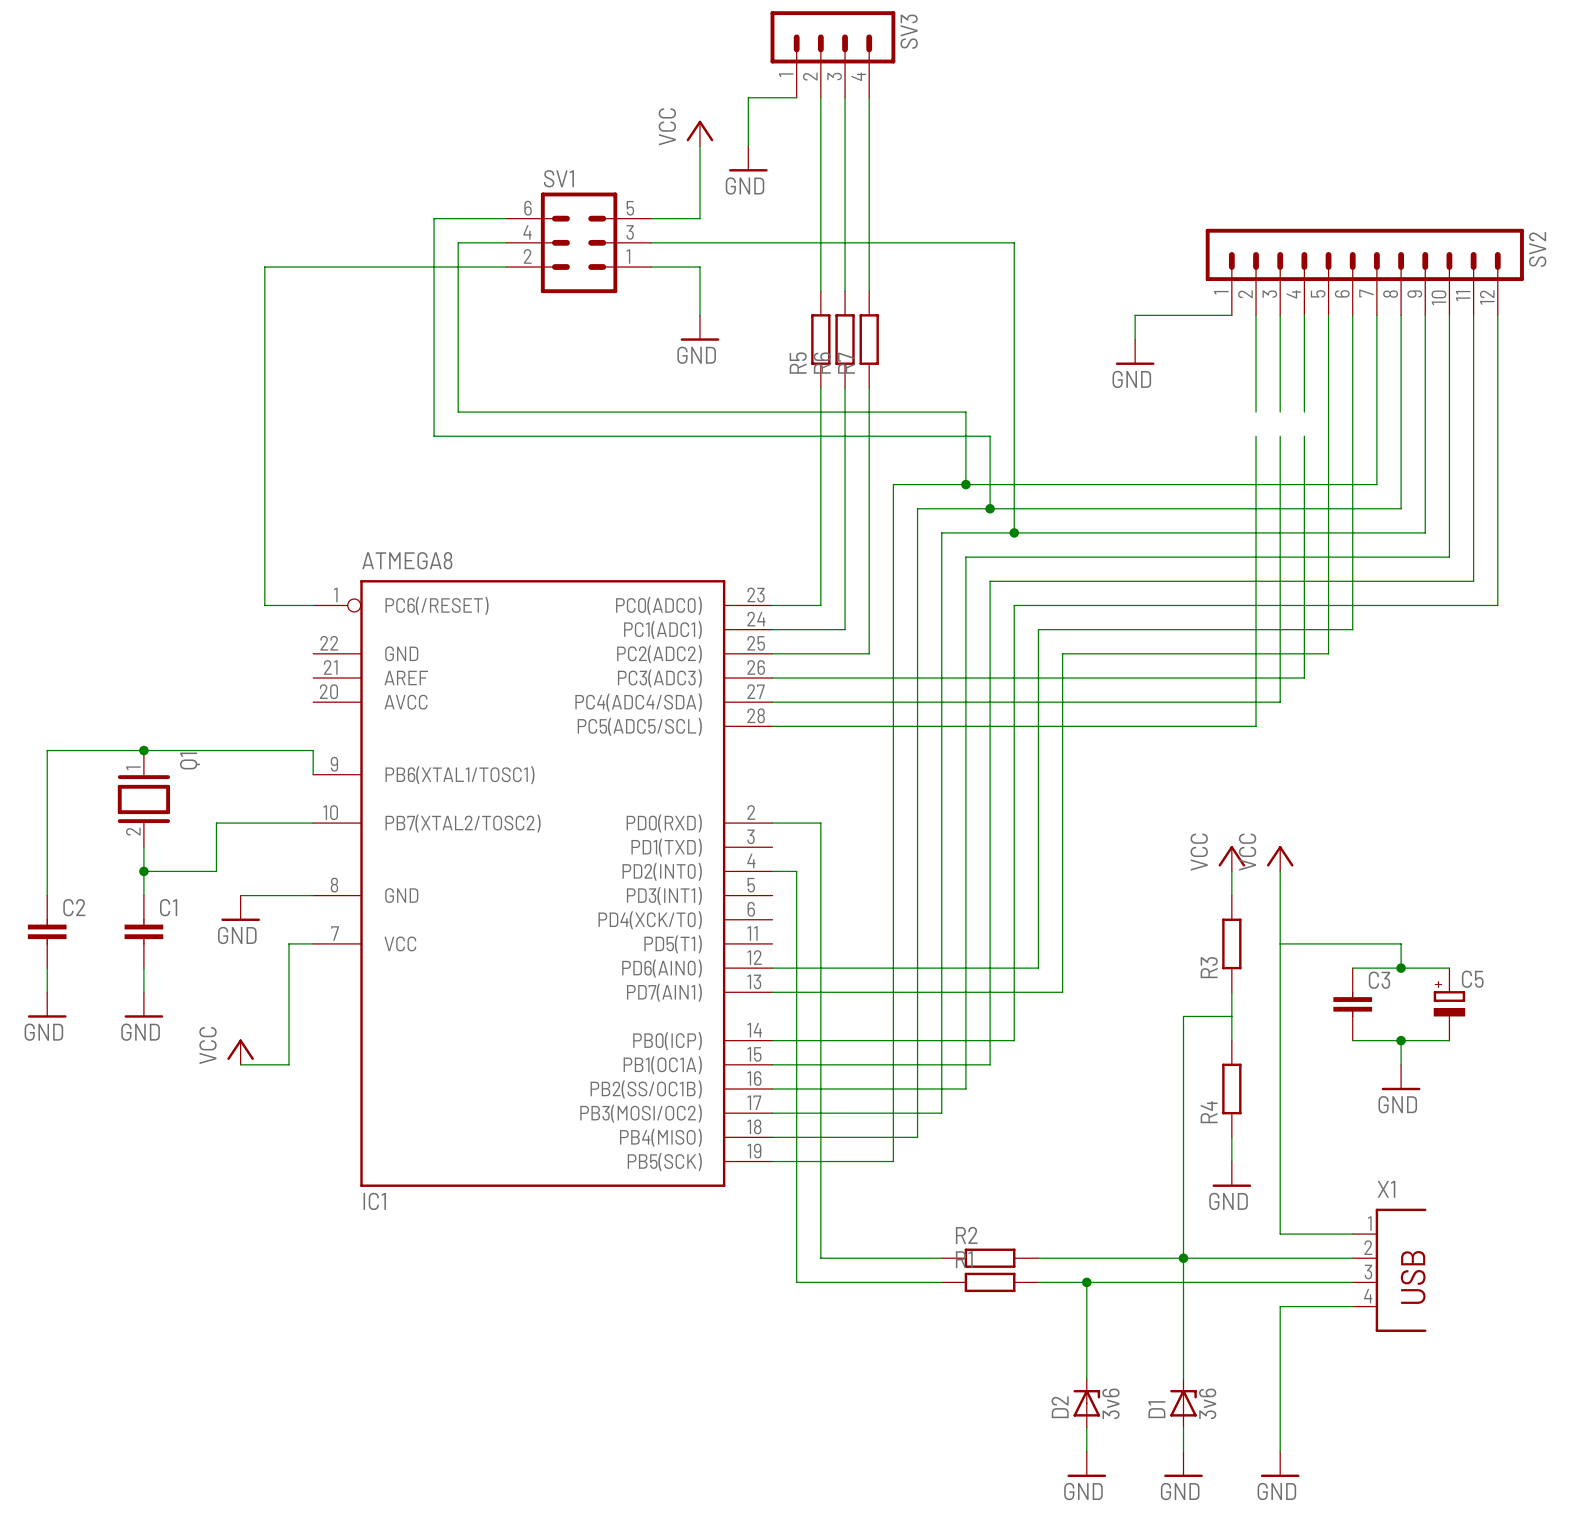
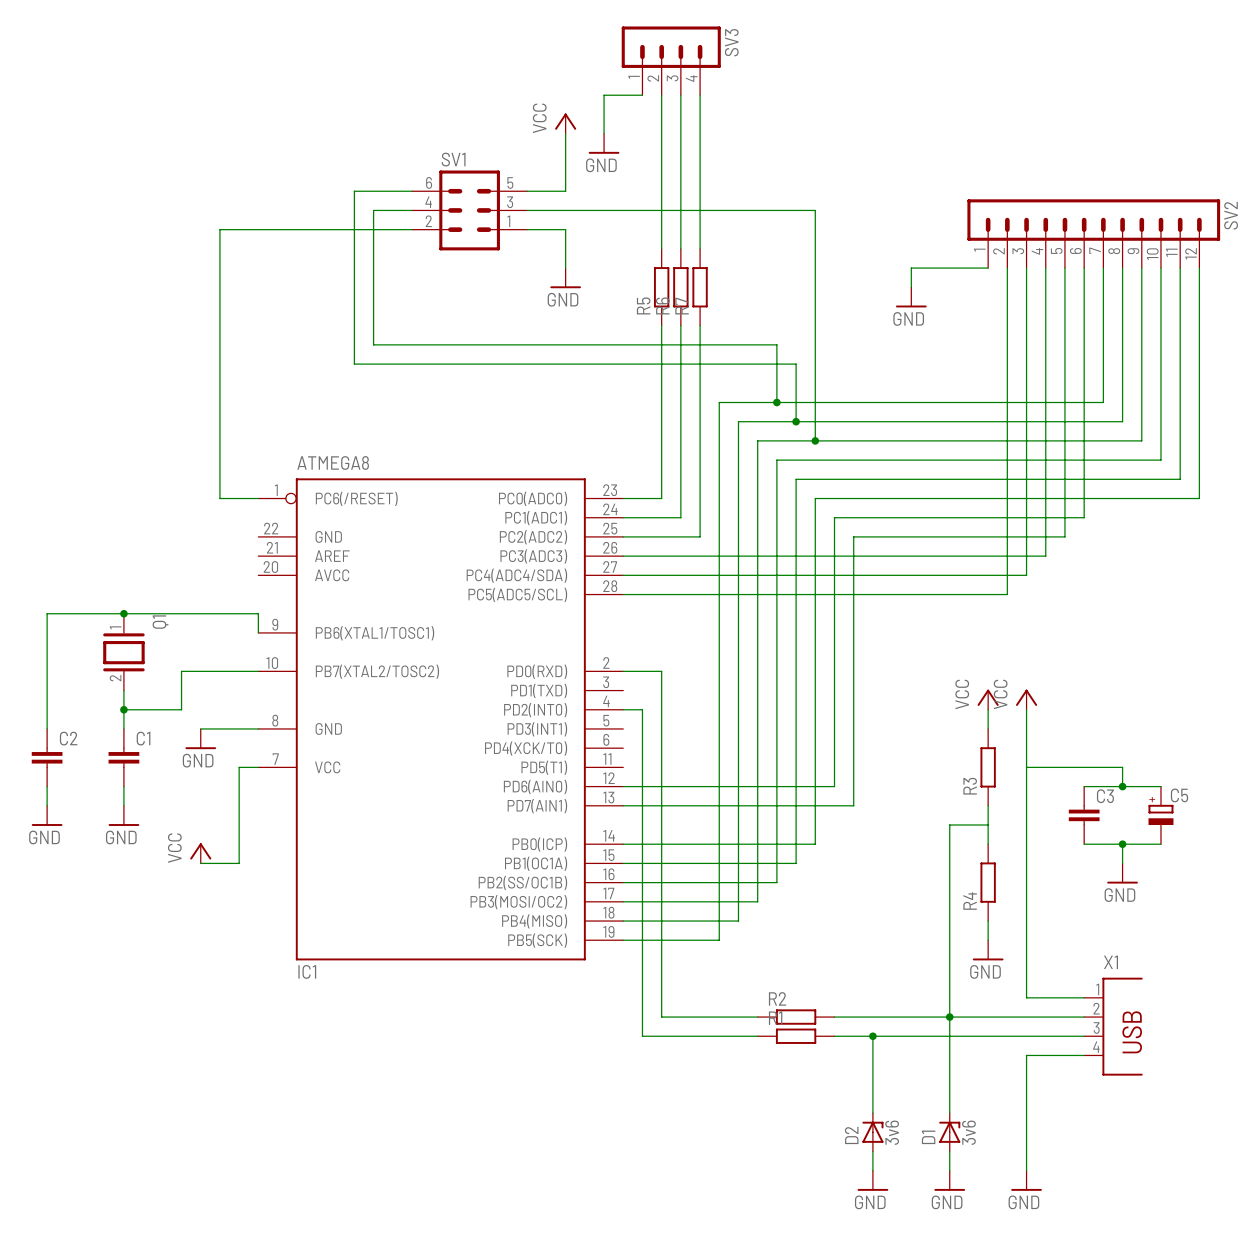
wire: none -> (1007, 344) (1007, 364)
wire: none -> (1026, 344) (1026, 364)
wire: none -> (1045, 344) (1045, 364)

